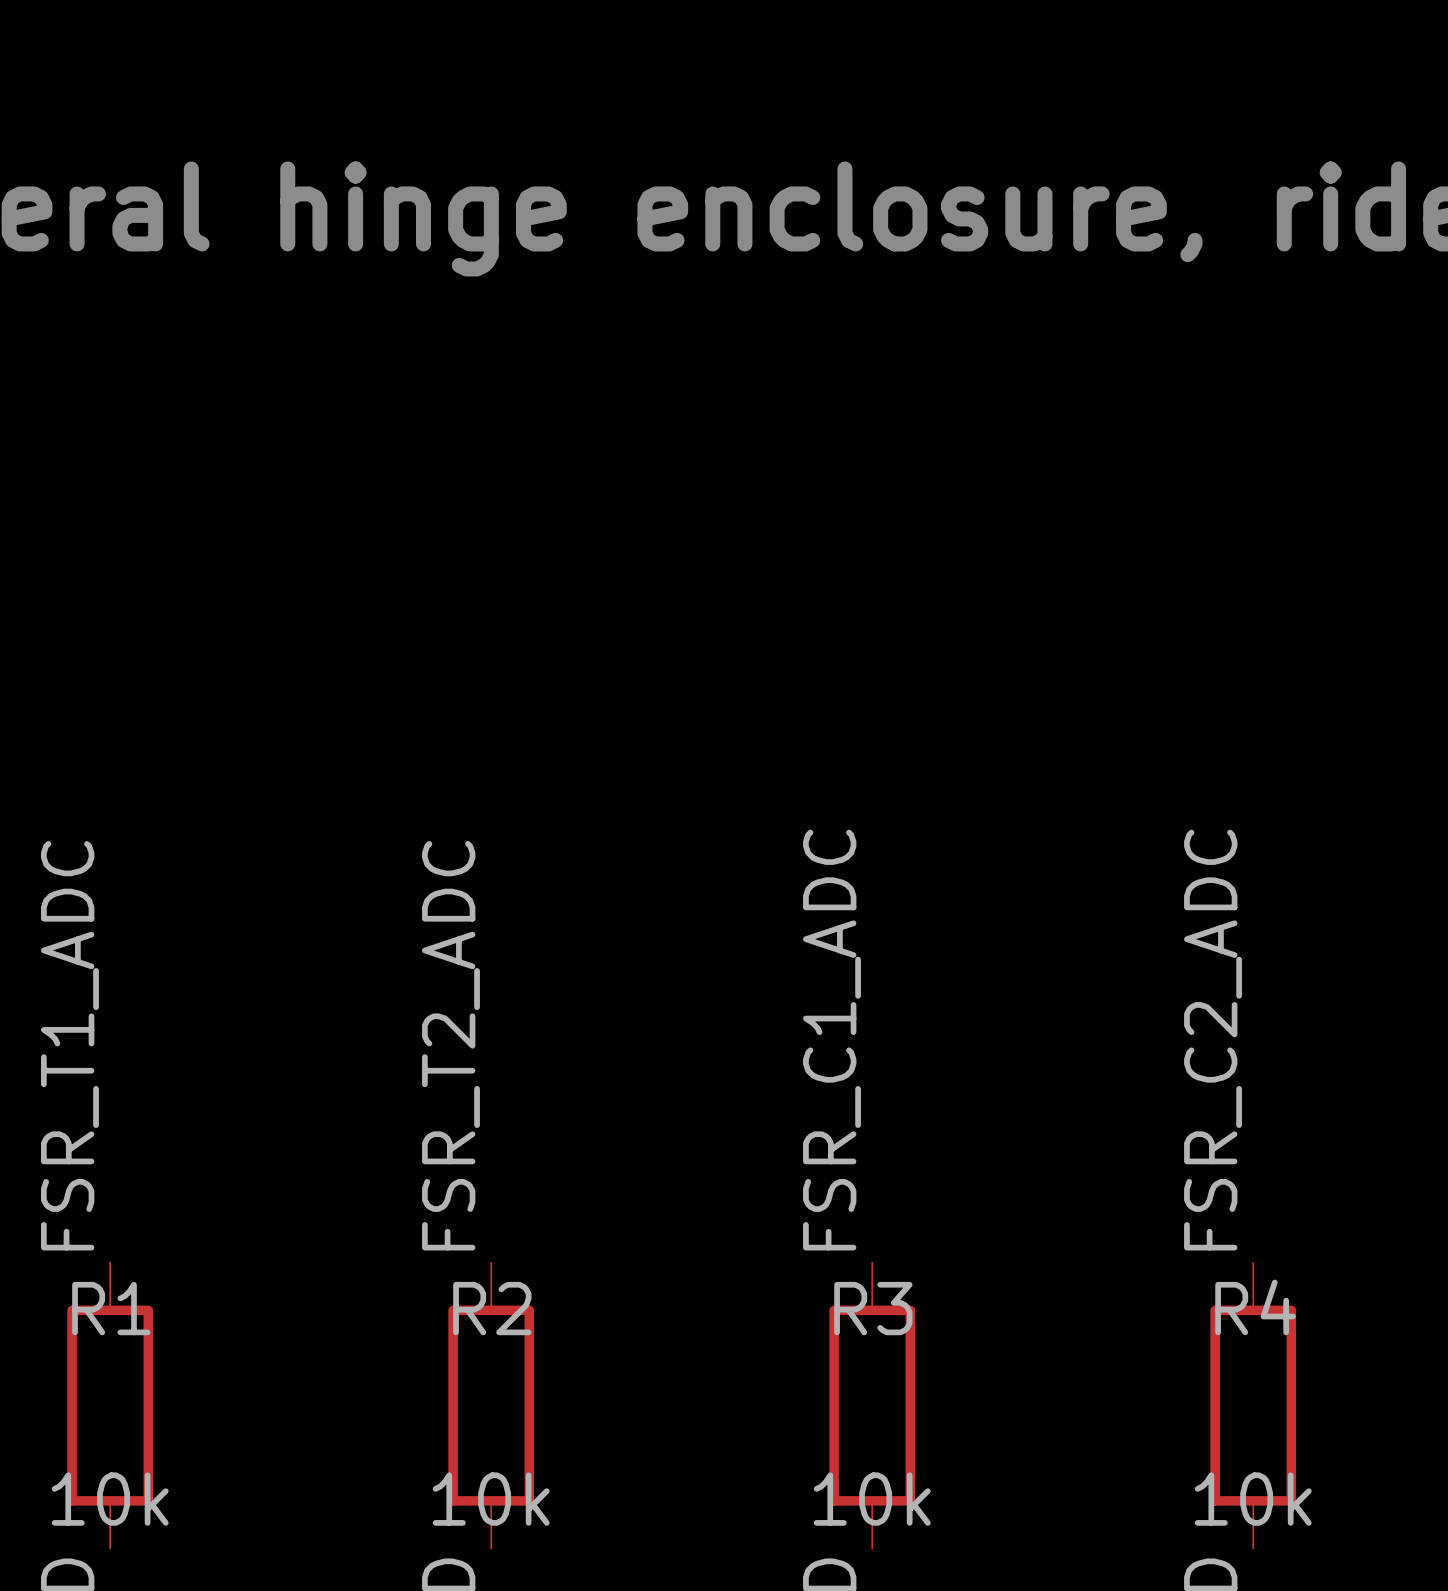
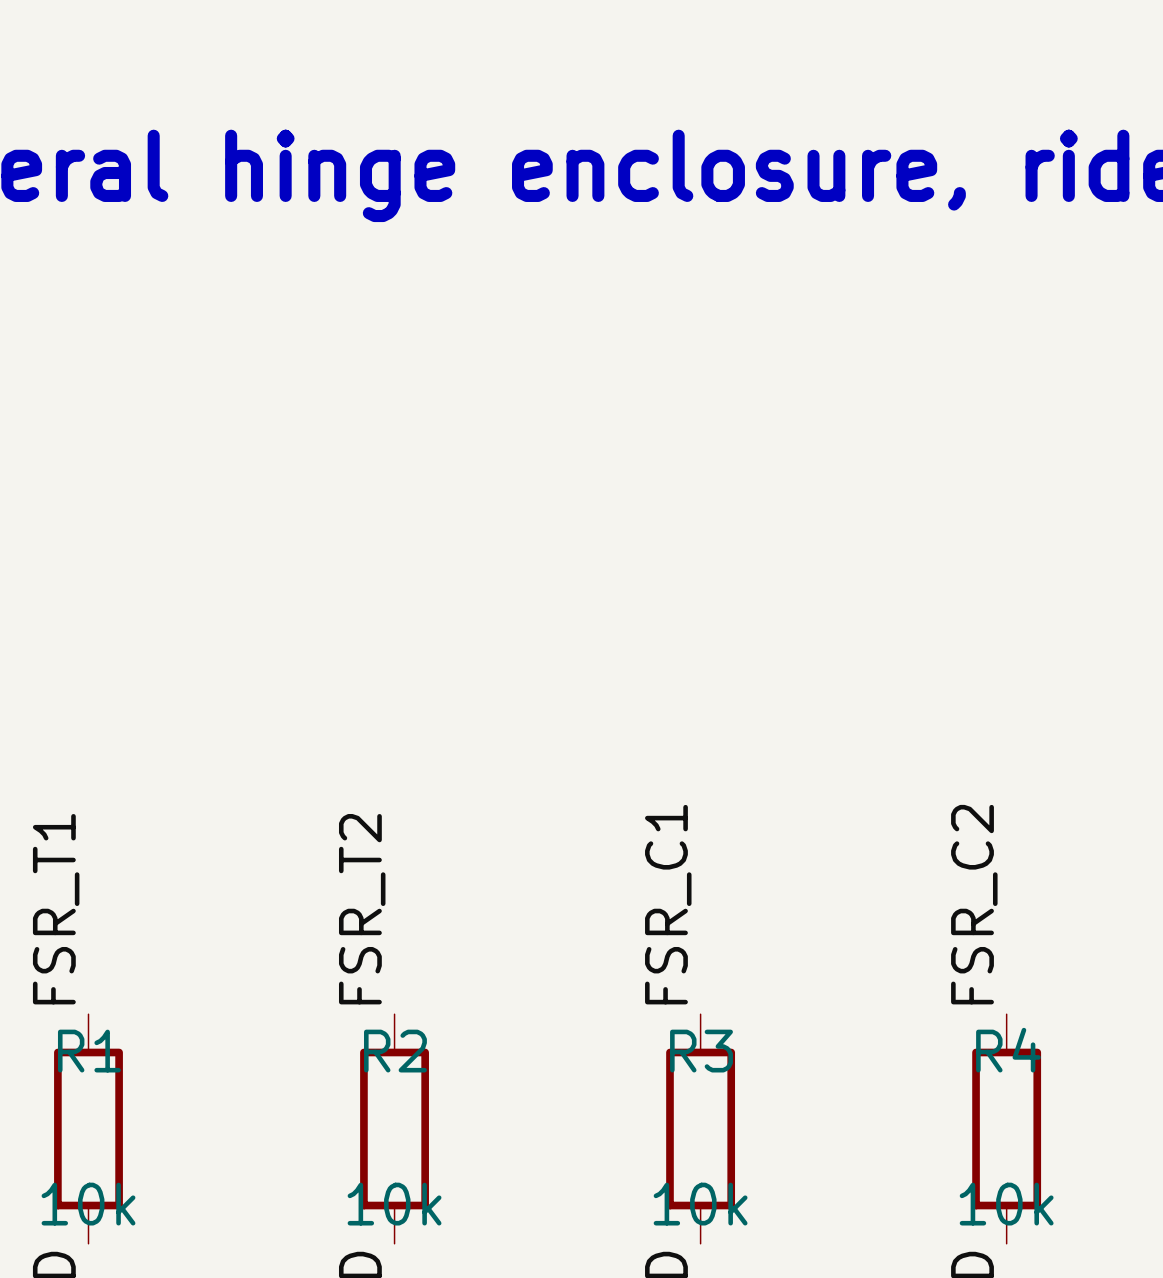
label: FSR_C1_ADC (832, 1040) -> FSR_C1 (668, 904)
label: FSR_C2_ADC (1213, 1040) -> FSR_C2 (974, 904)
label: FSR_T1_ADC (69, 1045) -> FSR_T1 (56, 909)
label: FSR_T2_ADC (450, 1045) -> FSR_T2 (362, 909)

